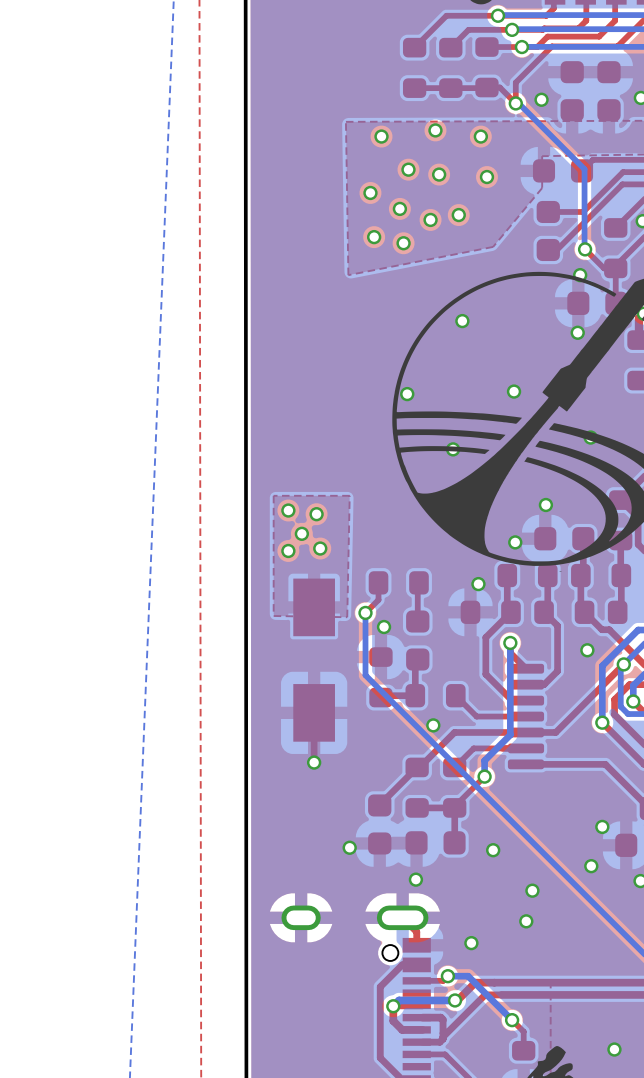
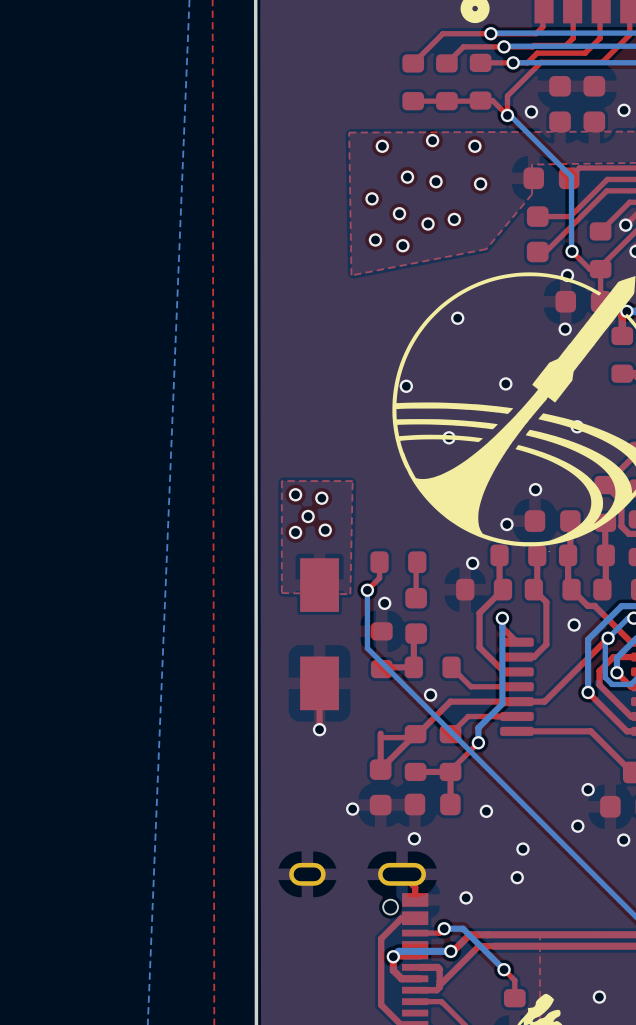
top track: none -> (380, 733) (380, 769)
top track: none -> (412, 737) (381, 737)

